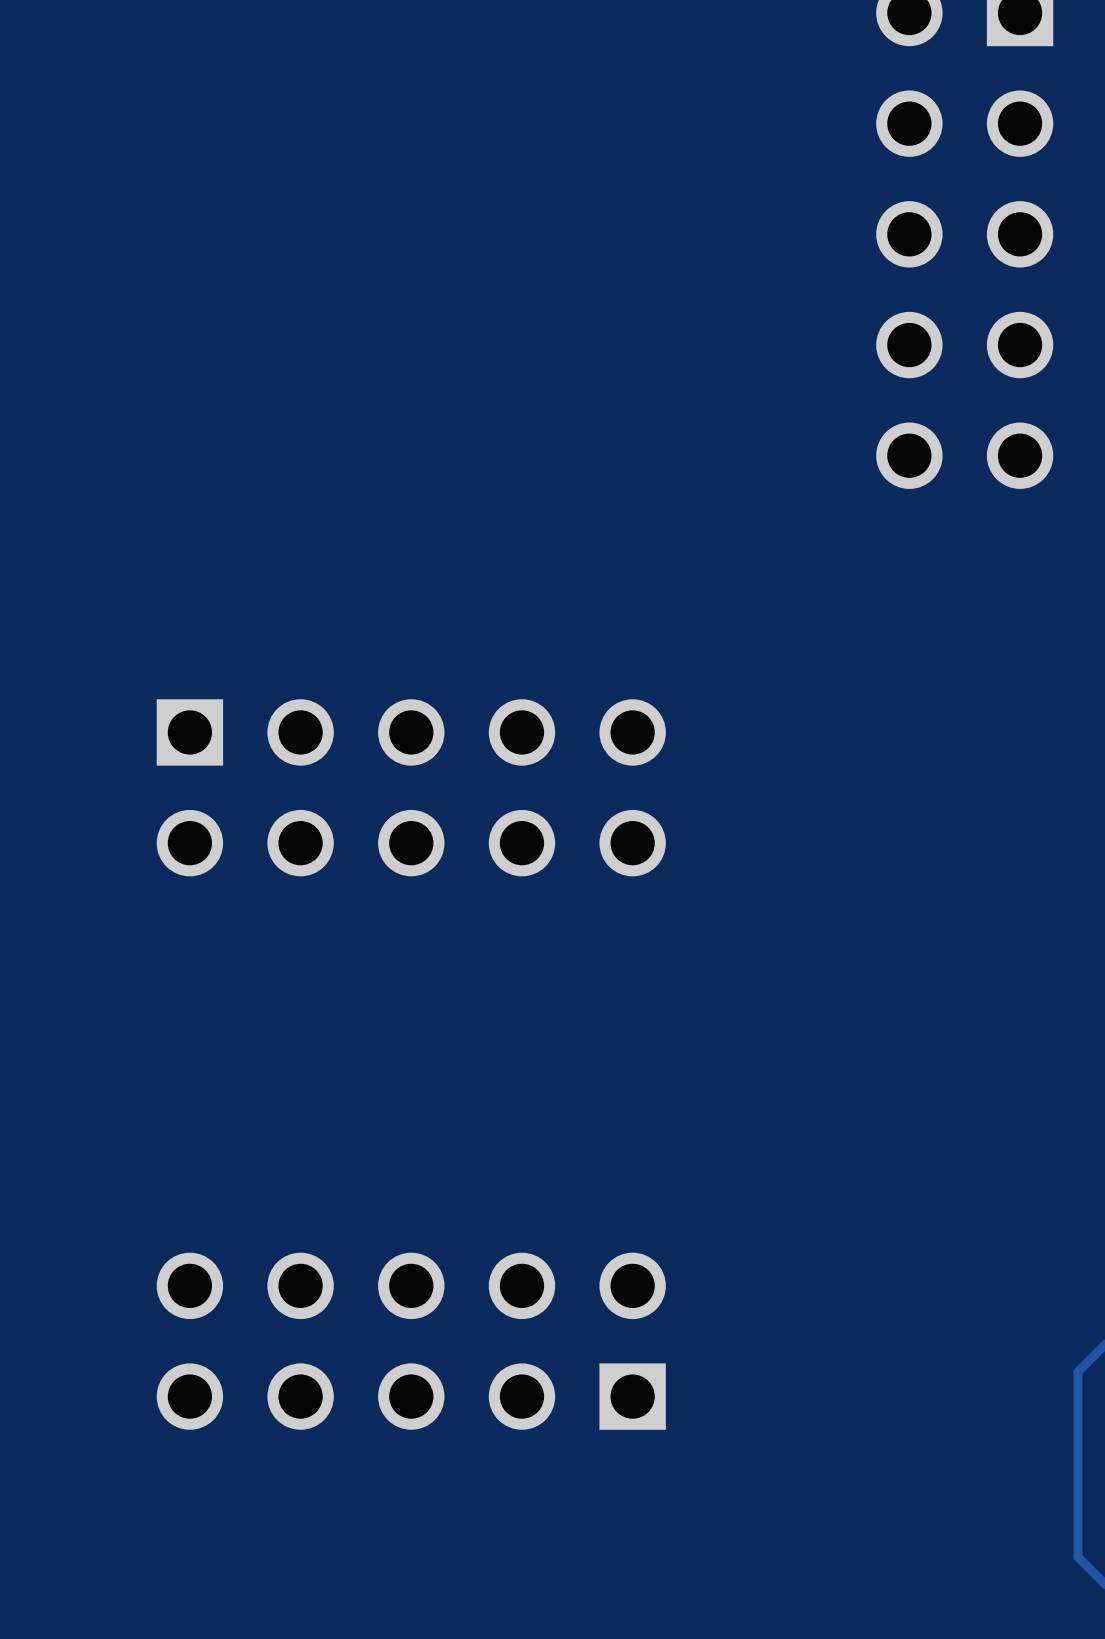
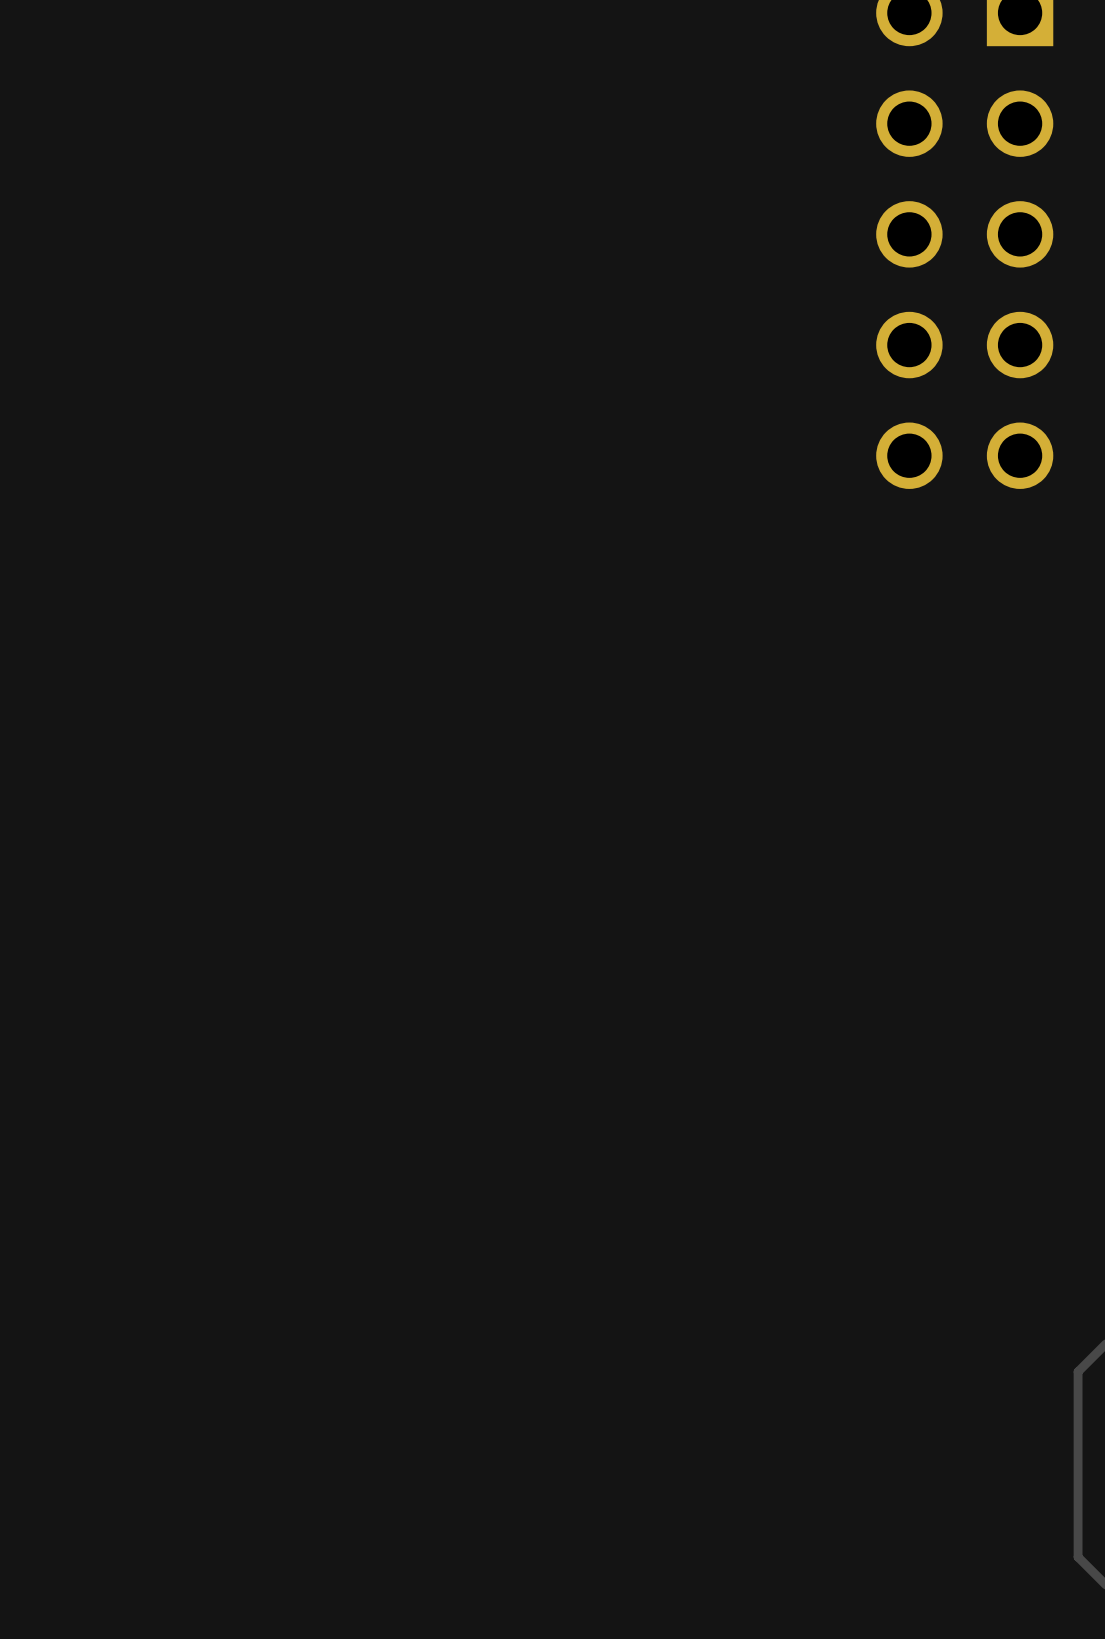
part: (411, 787) -> none
part: (411, 1341) -> none

